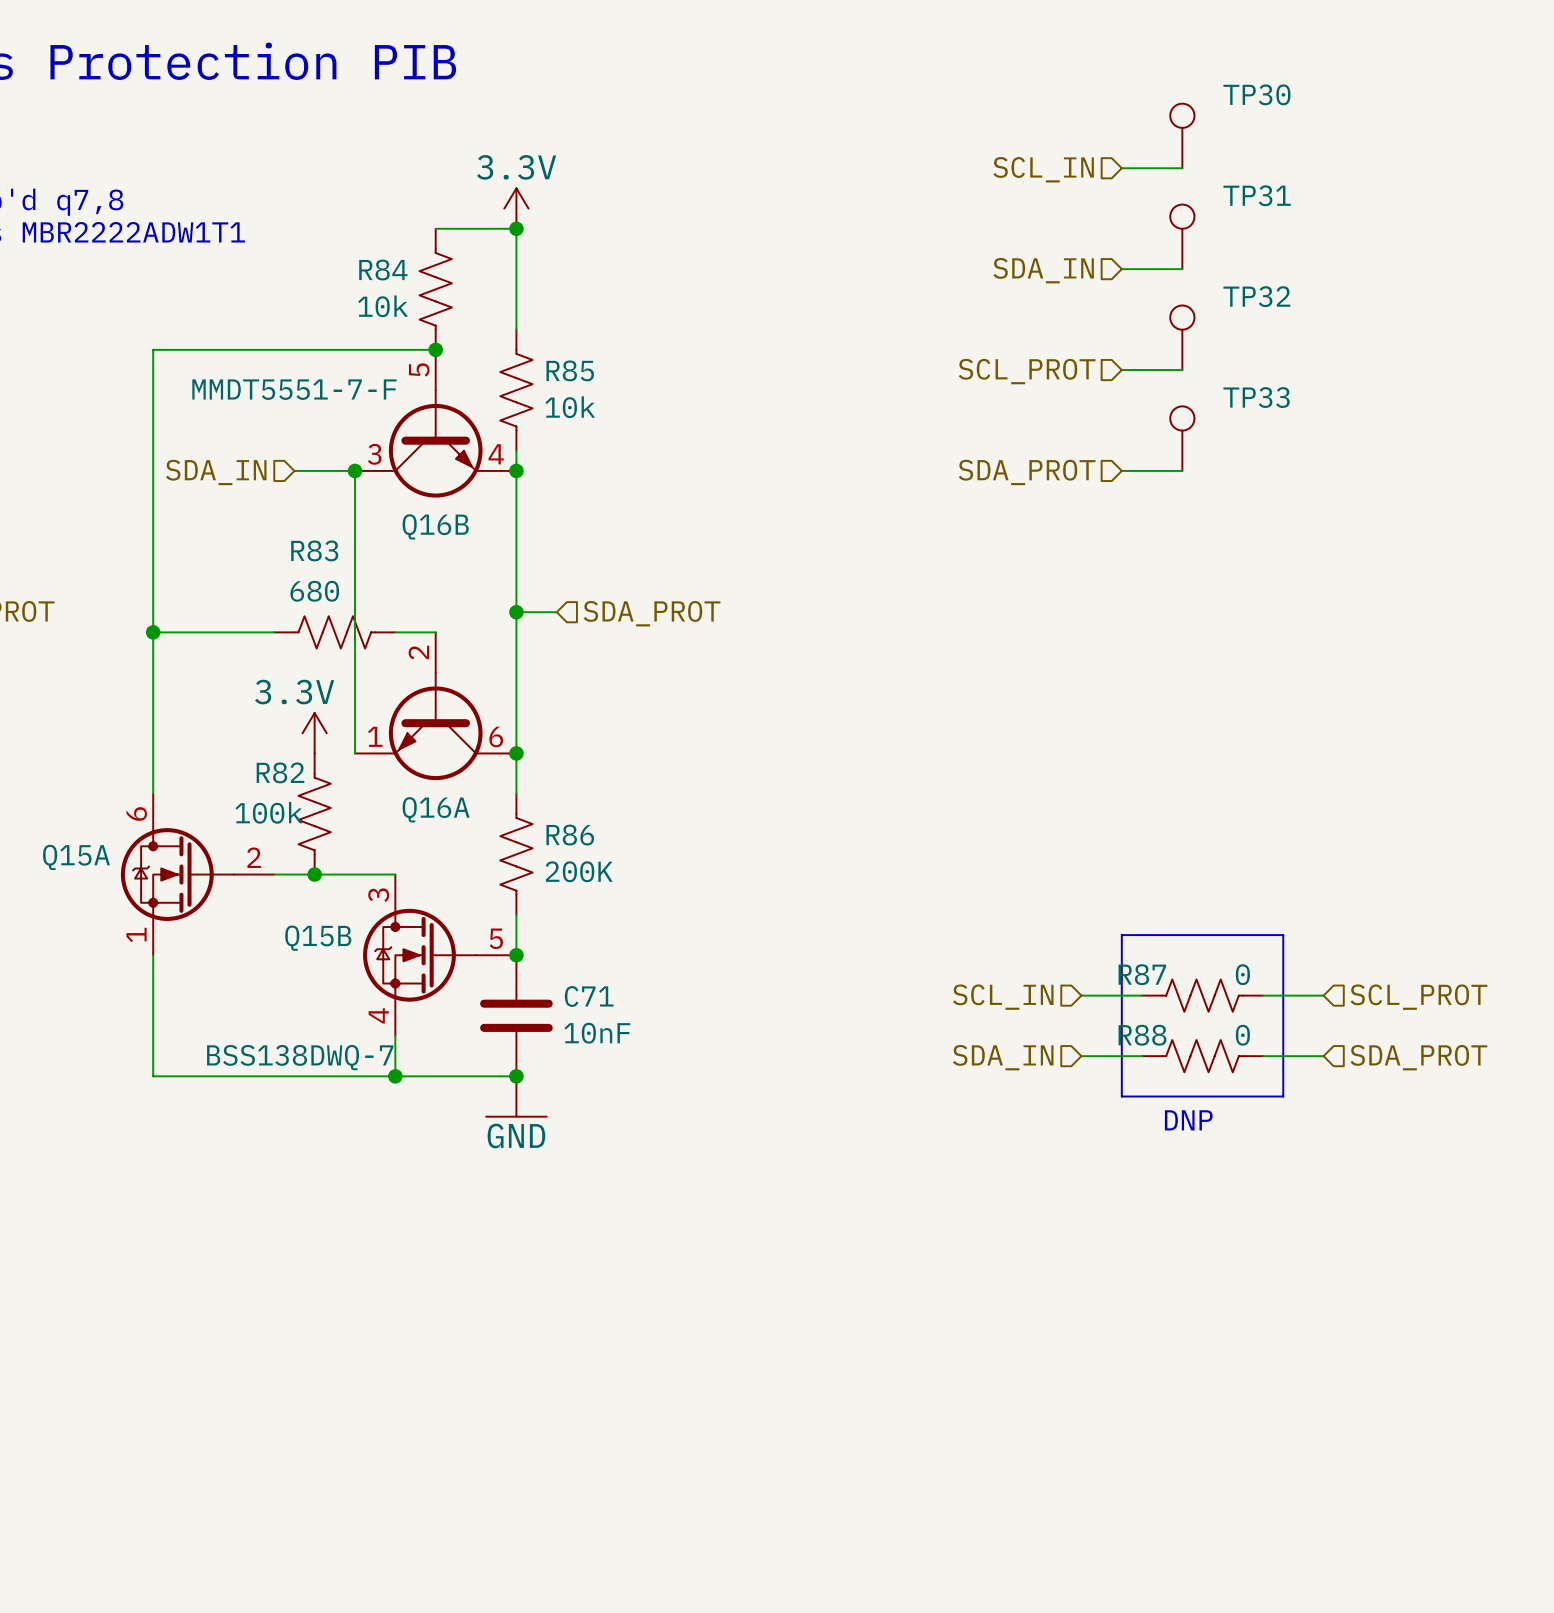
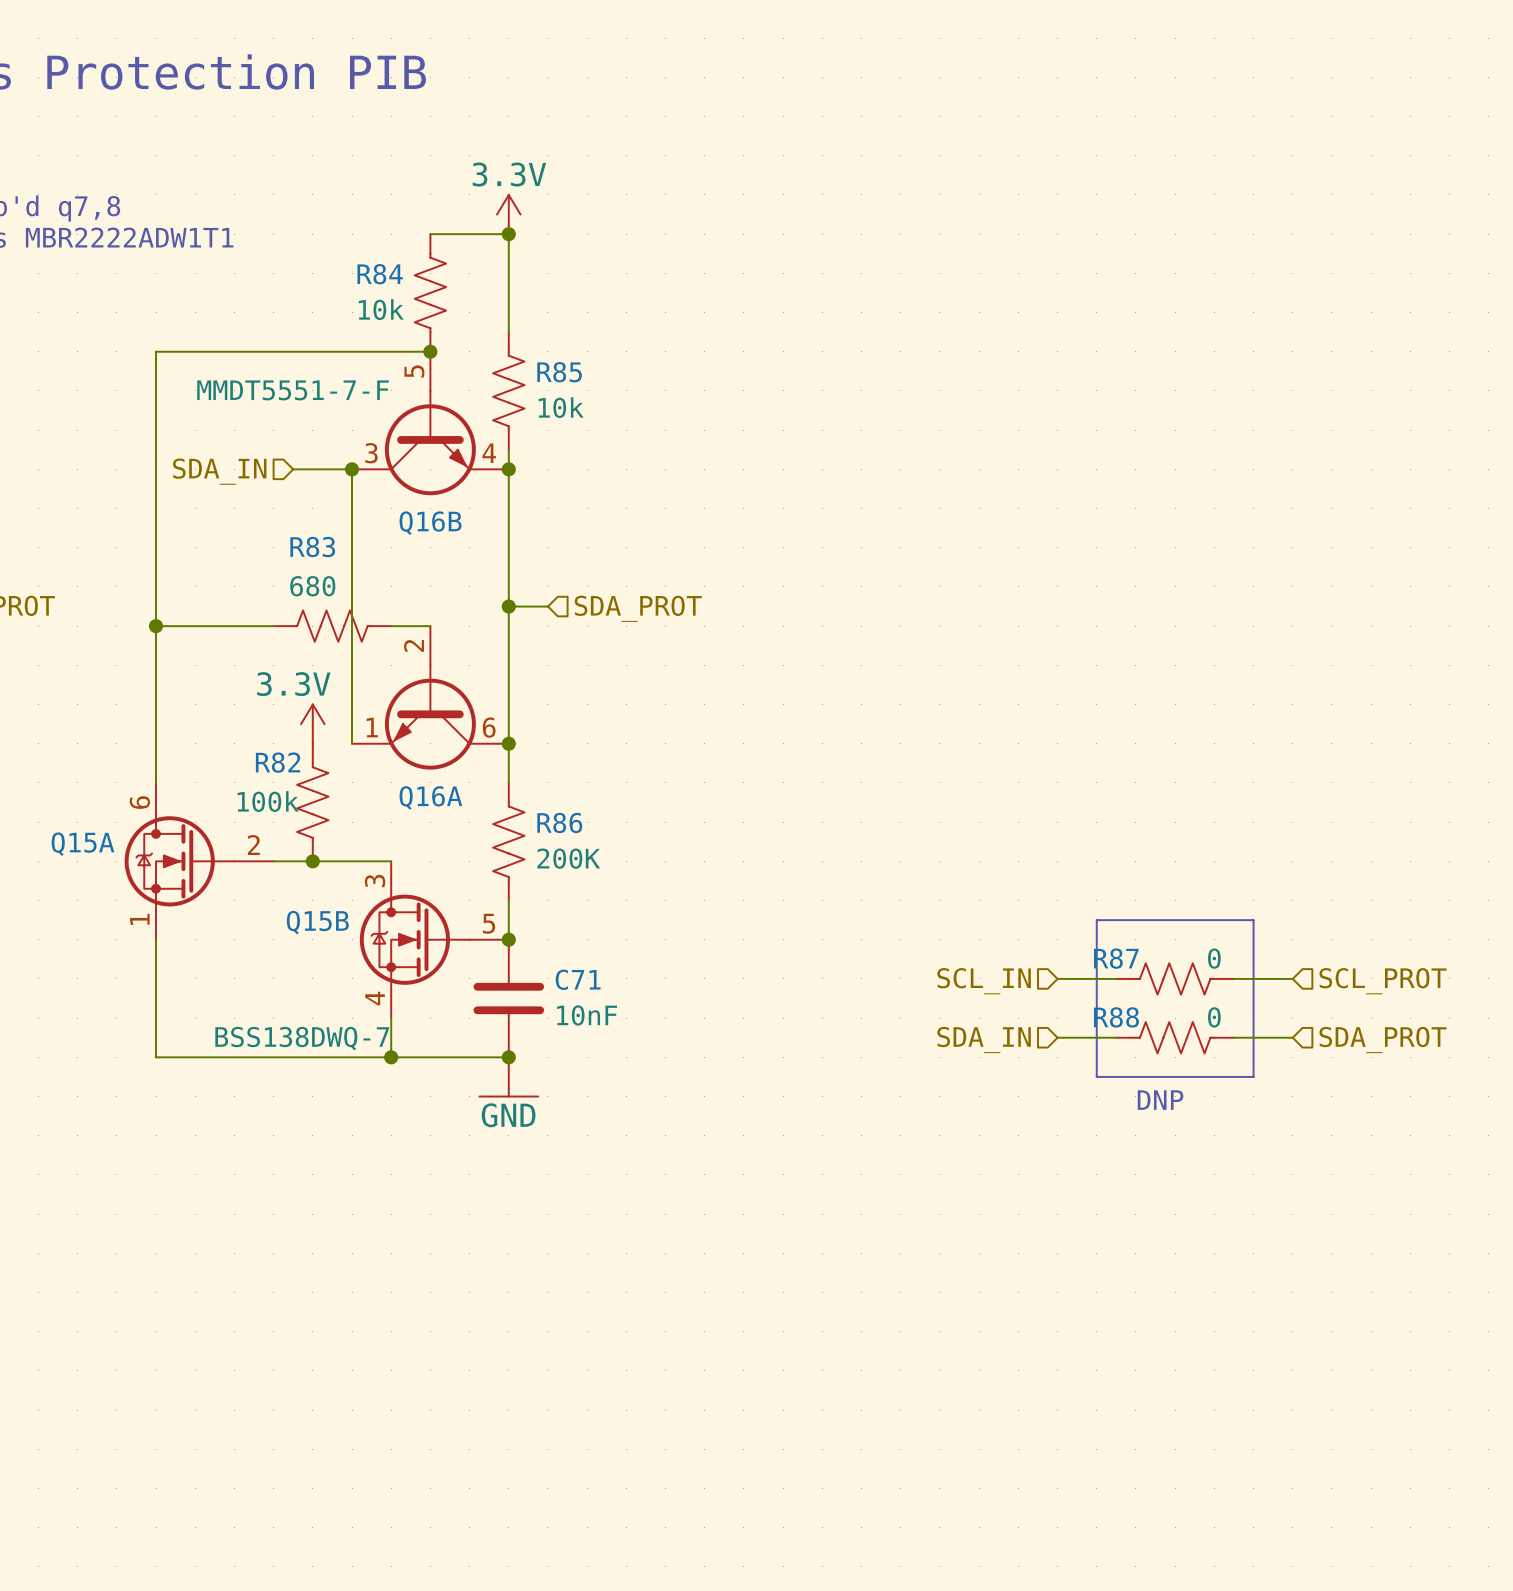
TP30: (1182, 135) -> none
wire: (1121, 168) (1182, 168) -> none
hierarchical label: SCL_IN (1043, 169) -> none
TP31: (1182, 236) -> none
wire: (1121, 269) (1182, 269) -> none
hierarchical label: SDA_IN (1043, 270) -> none
TP32: (1182, 337) -> none
wire: (1121, 370) (1182, 370) -> none
hierarchical label: SCL_PROT (1027, 371) -> none
TP33: (1182, 438) -> none
wire: (1121, 470) (1182, 470) -> none
hierarchical label: SDA_PROT (1027, 472) -> none

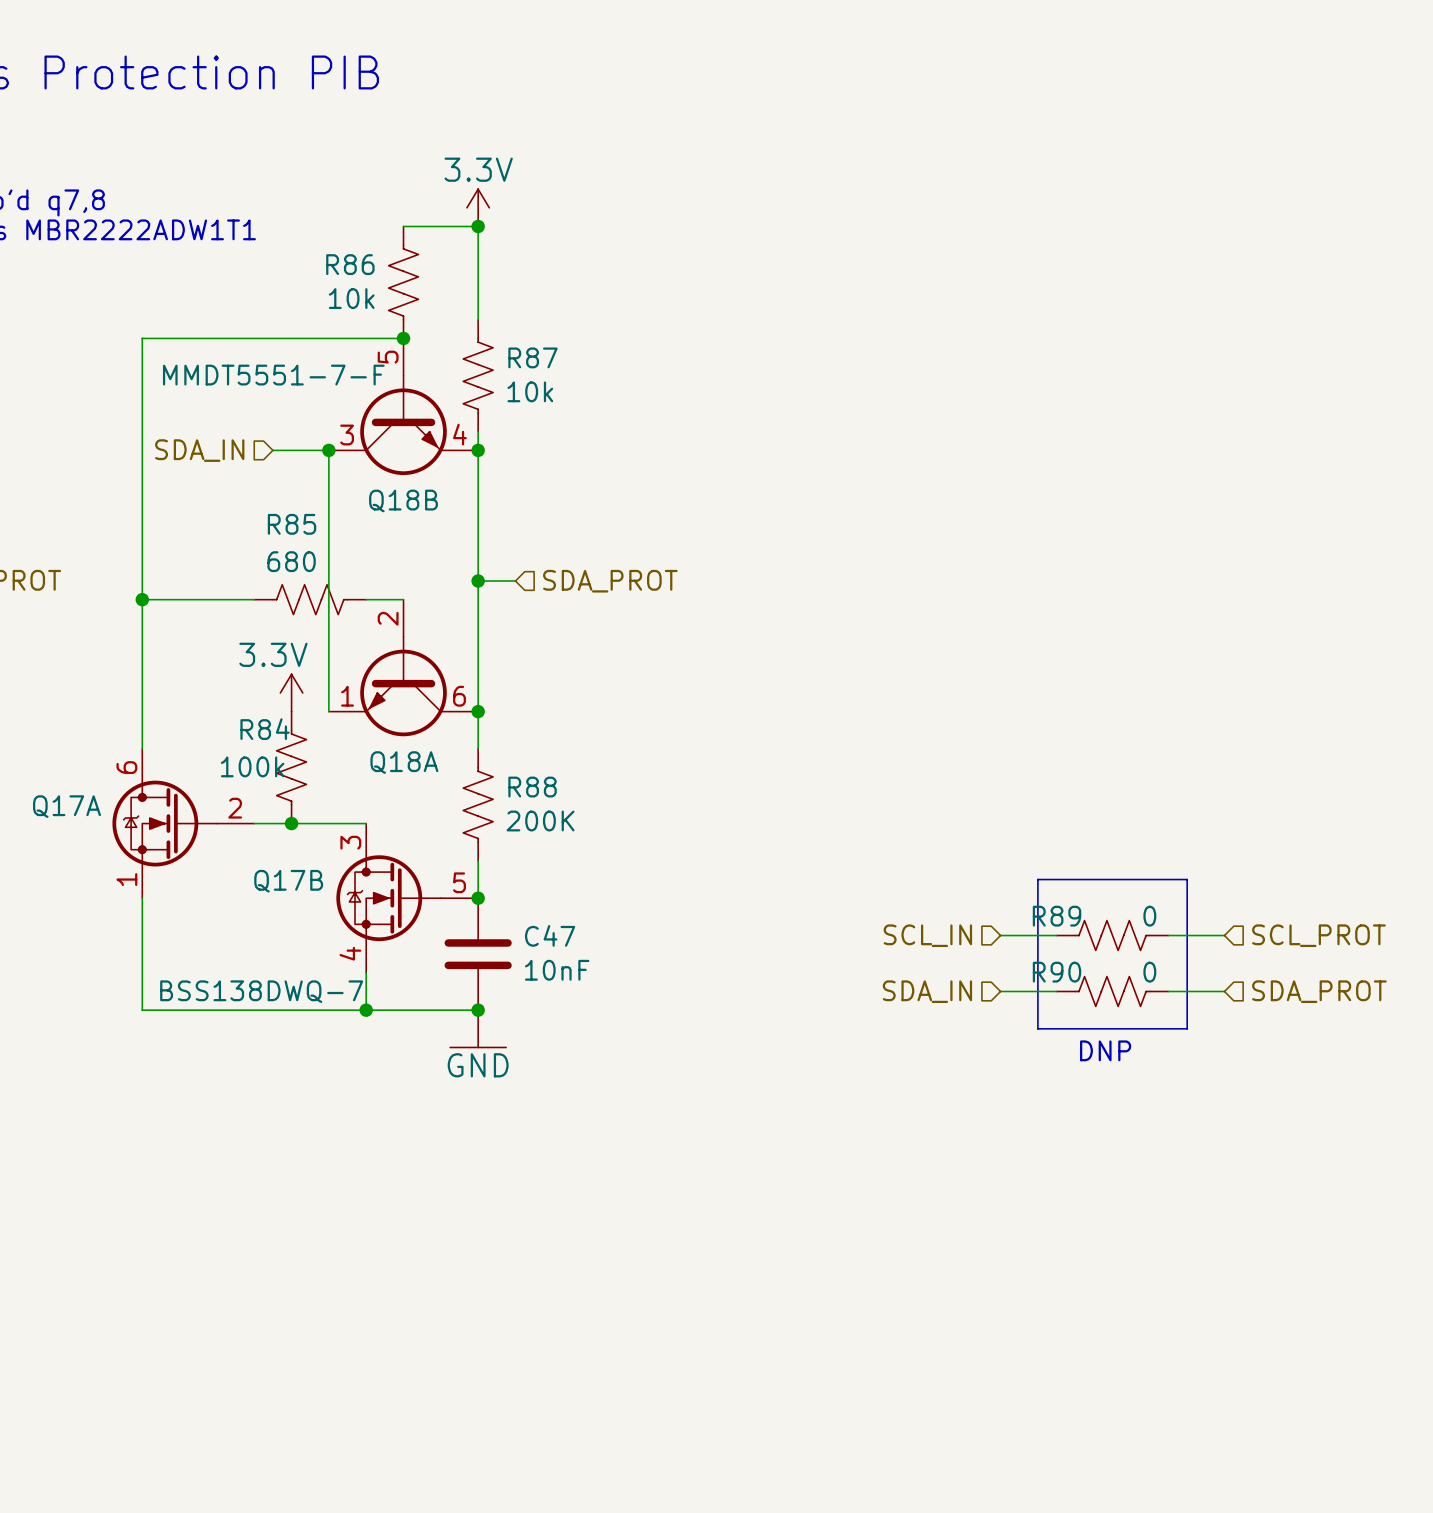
R84 name: R84 (380, 274) -> R86 (350, 264)
R85 name: R85 (559, 372) -> R87 (532, 357)
Q16B name: Q16B (430, 523) -> Q18B (403, 500)
R83 name: R83 (312, 547) -> R85 (292, 524)
R82 name: R82 (278, 762) -> R84 (265, 729)
Q16A name: Q16A (430, 797) -> Q18A (404, 762)
R86 name: R86 (559, 822) -> R88 (532, 787)
Q15A name: Q15A (83, 844) -> Q17A (66, 806)
Q15B name: Q15B (317, 922) -> Q17B (288, 881)
R87 name: R87 (1116, 958) -> R89 (1057, 916)
C71 name: C71 (578, 979) -> C47 (550, 935)
R88 name: R88 (1116, 1017) -> R90 (1057, 972)

